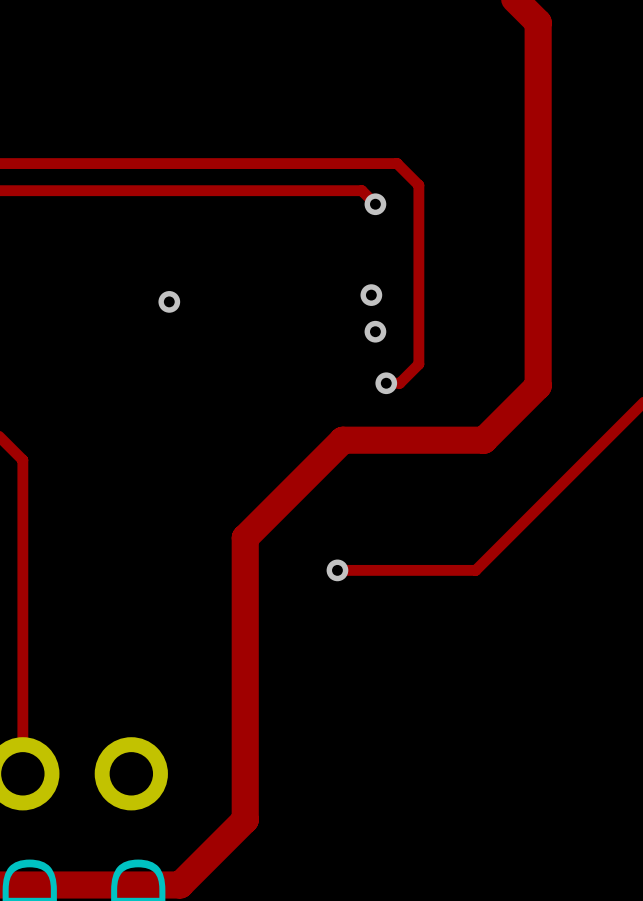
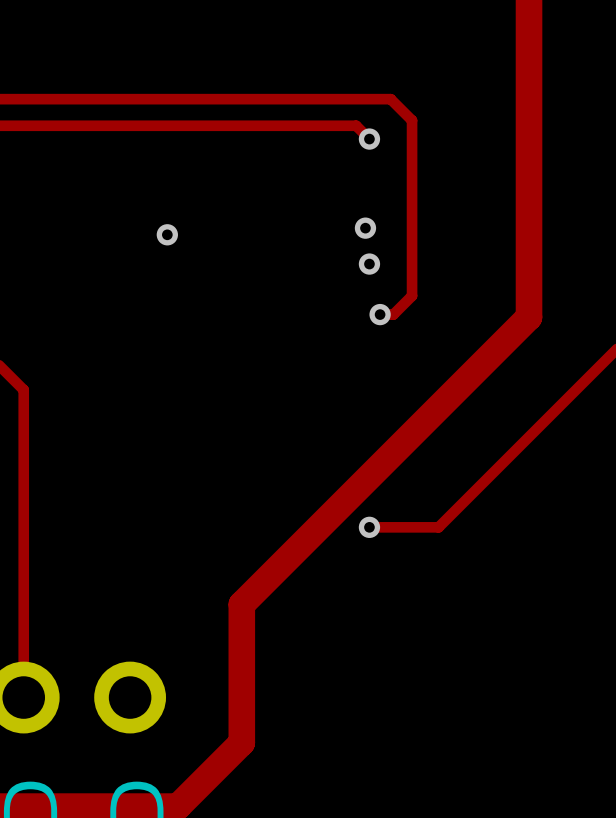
track: (483, 440) (342, 440) (245, 537) (245, 678) -> (475, 370) (241, 604)
track: (337, 570) (475, 570) -> (369, 527) (438, 527) (467, 498)
via position: (337, 570) -> (369, 527)

